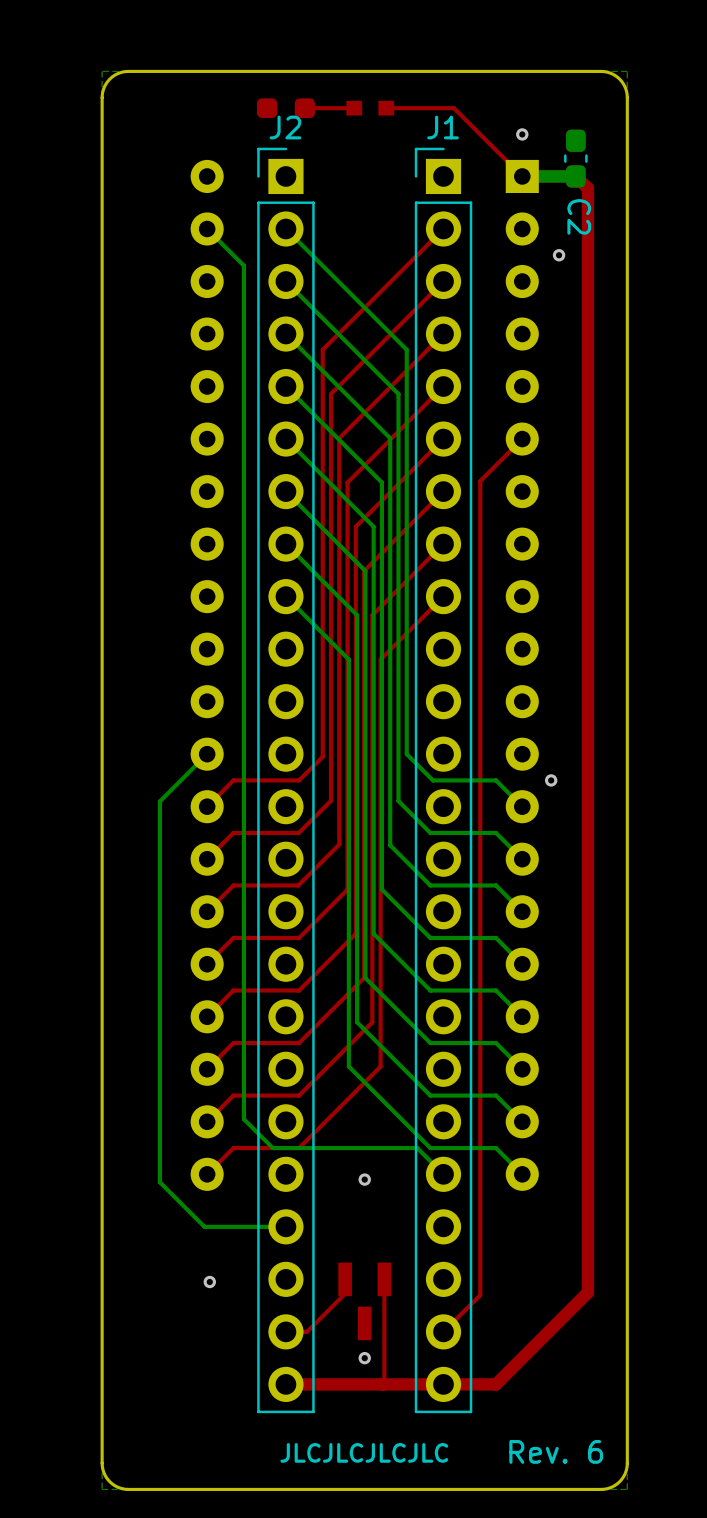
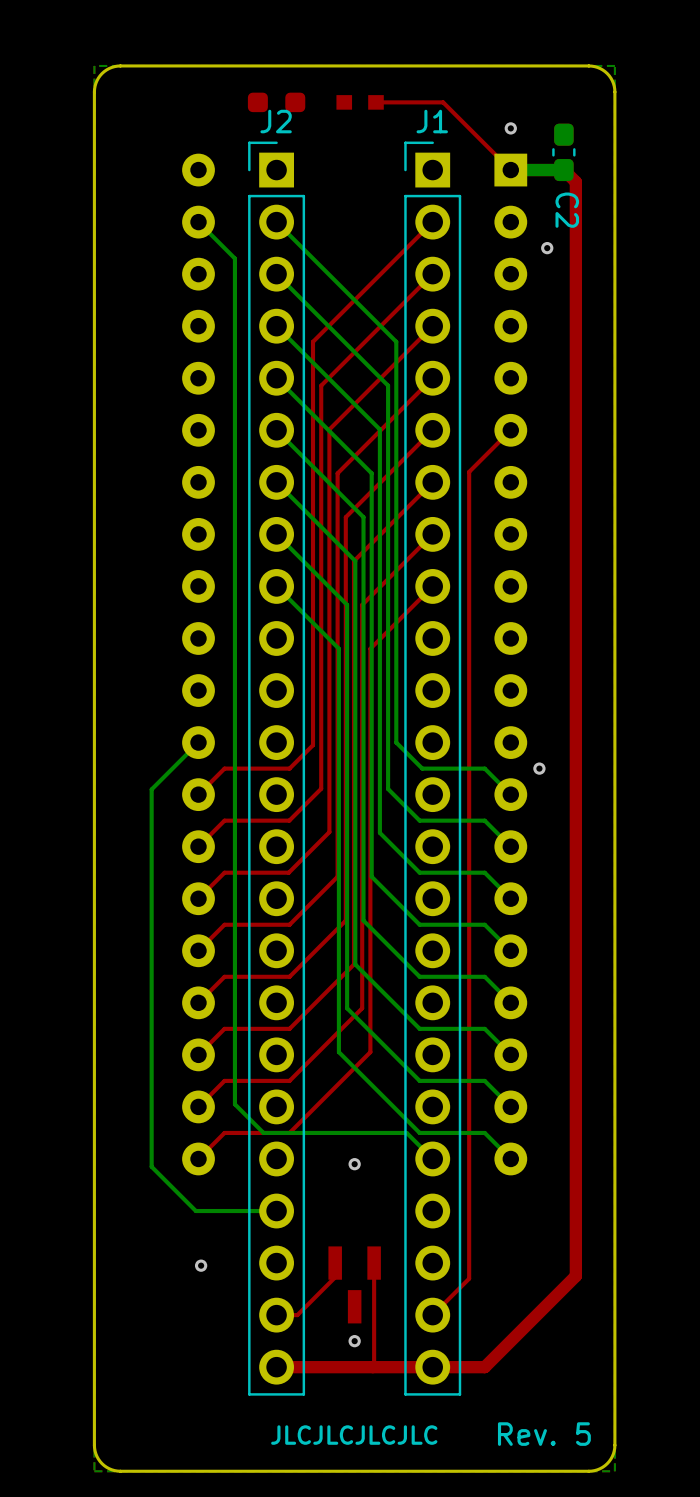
top track: (354, 108) (304, 108) -> none
text: Rev. 6 (556, 1451) -> Rev. 5 (544, 1434)

